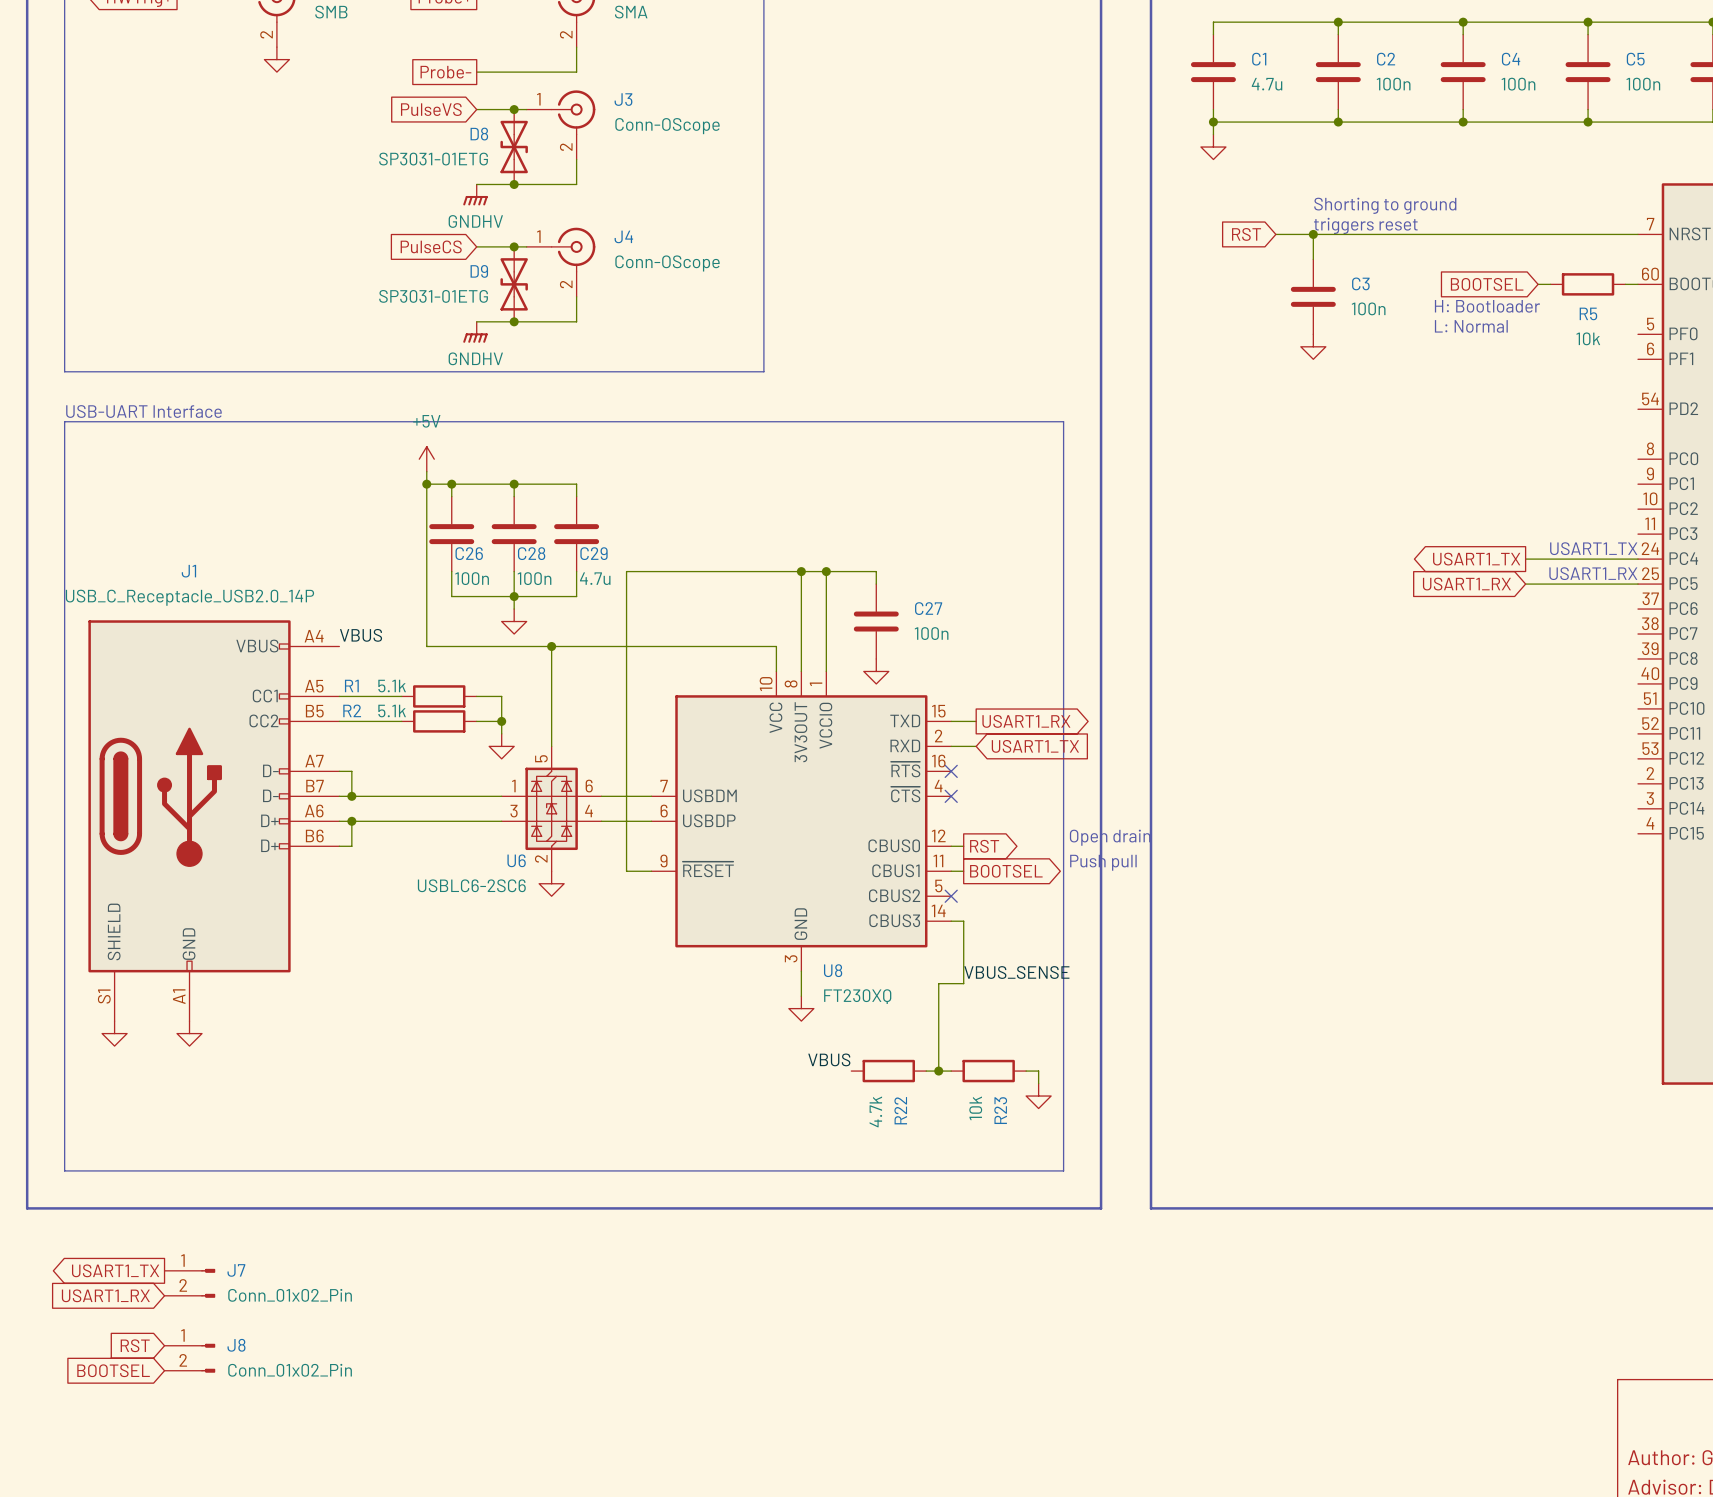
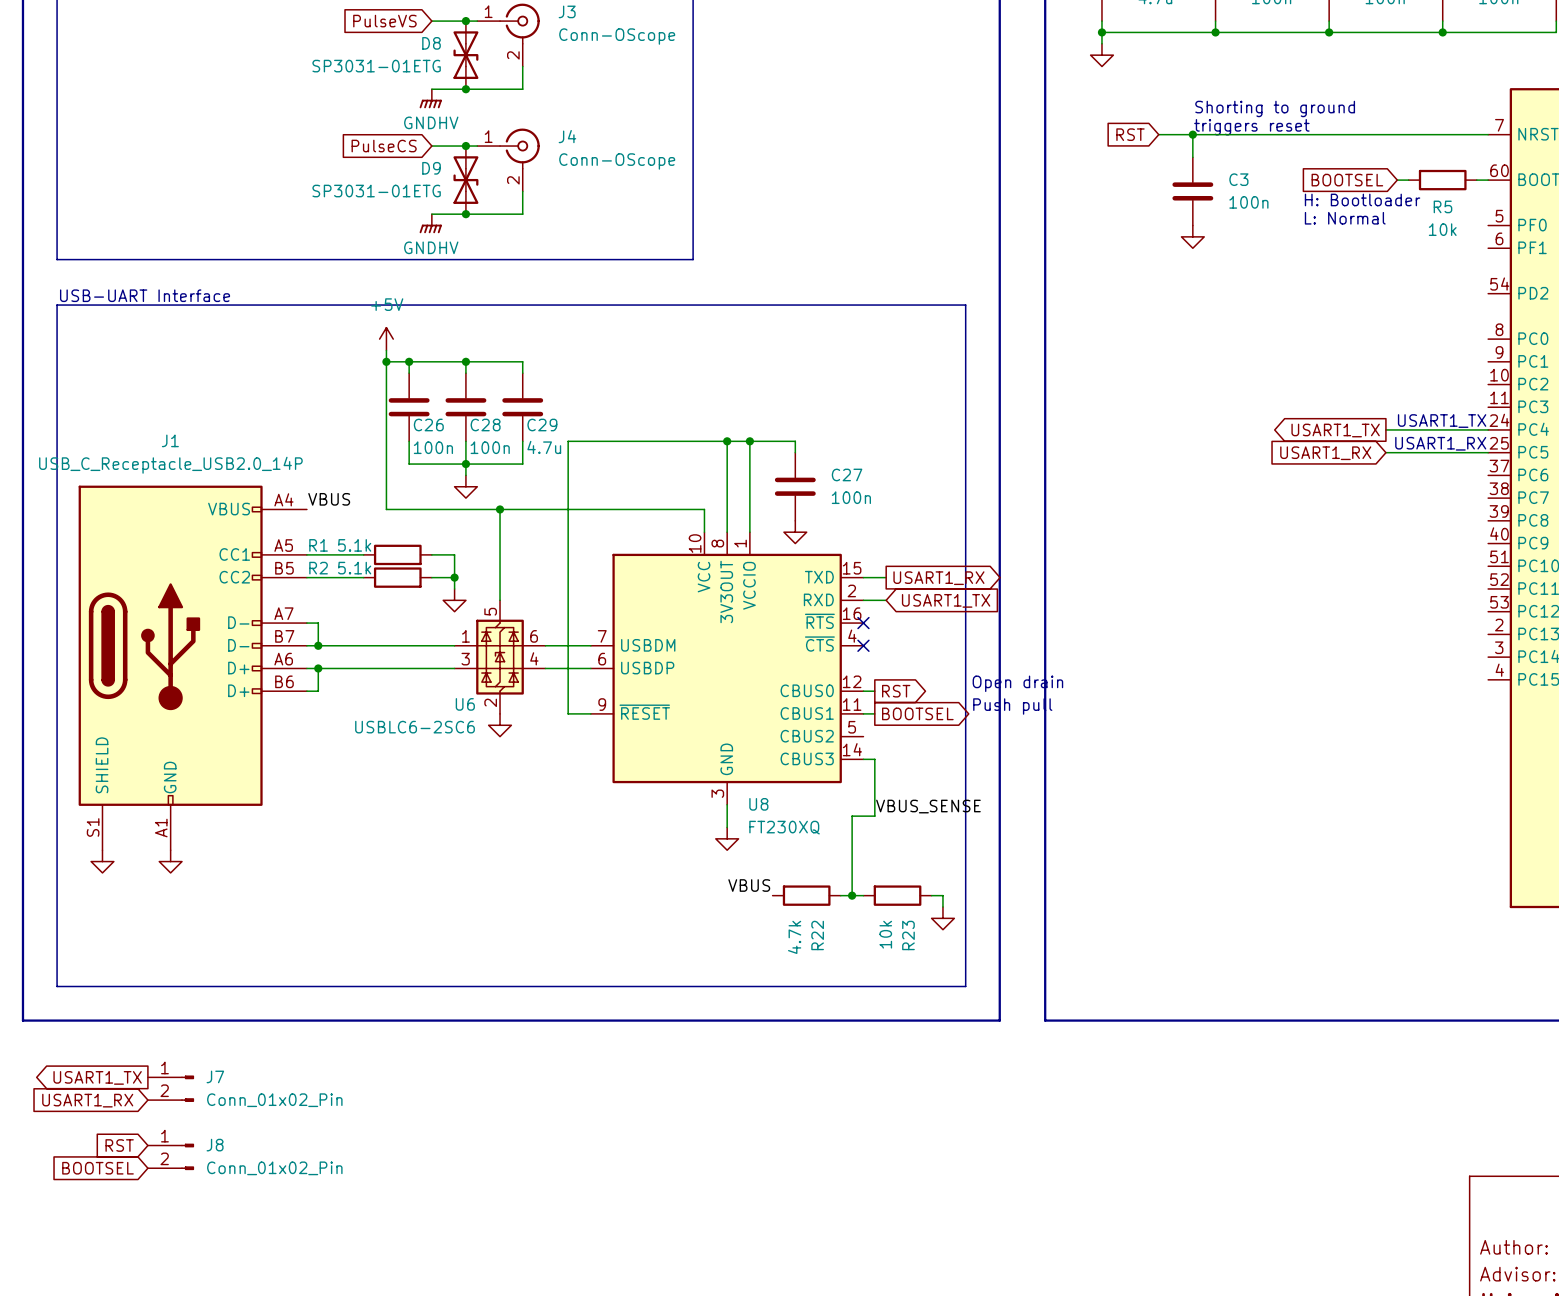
no-connect mark: (951, 896) -> none

